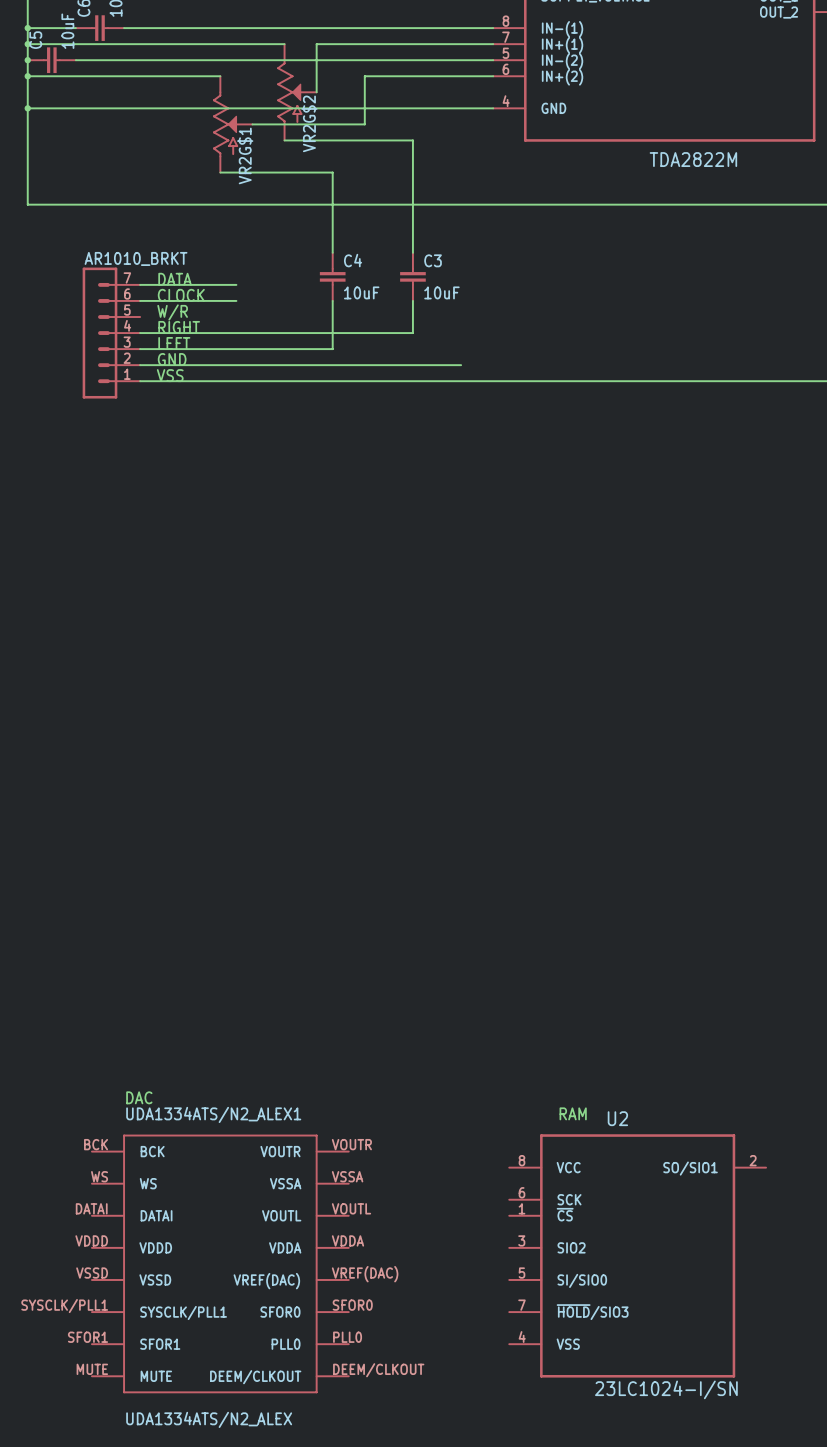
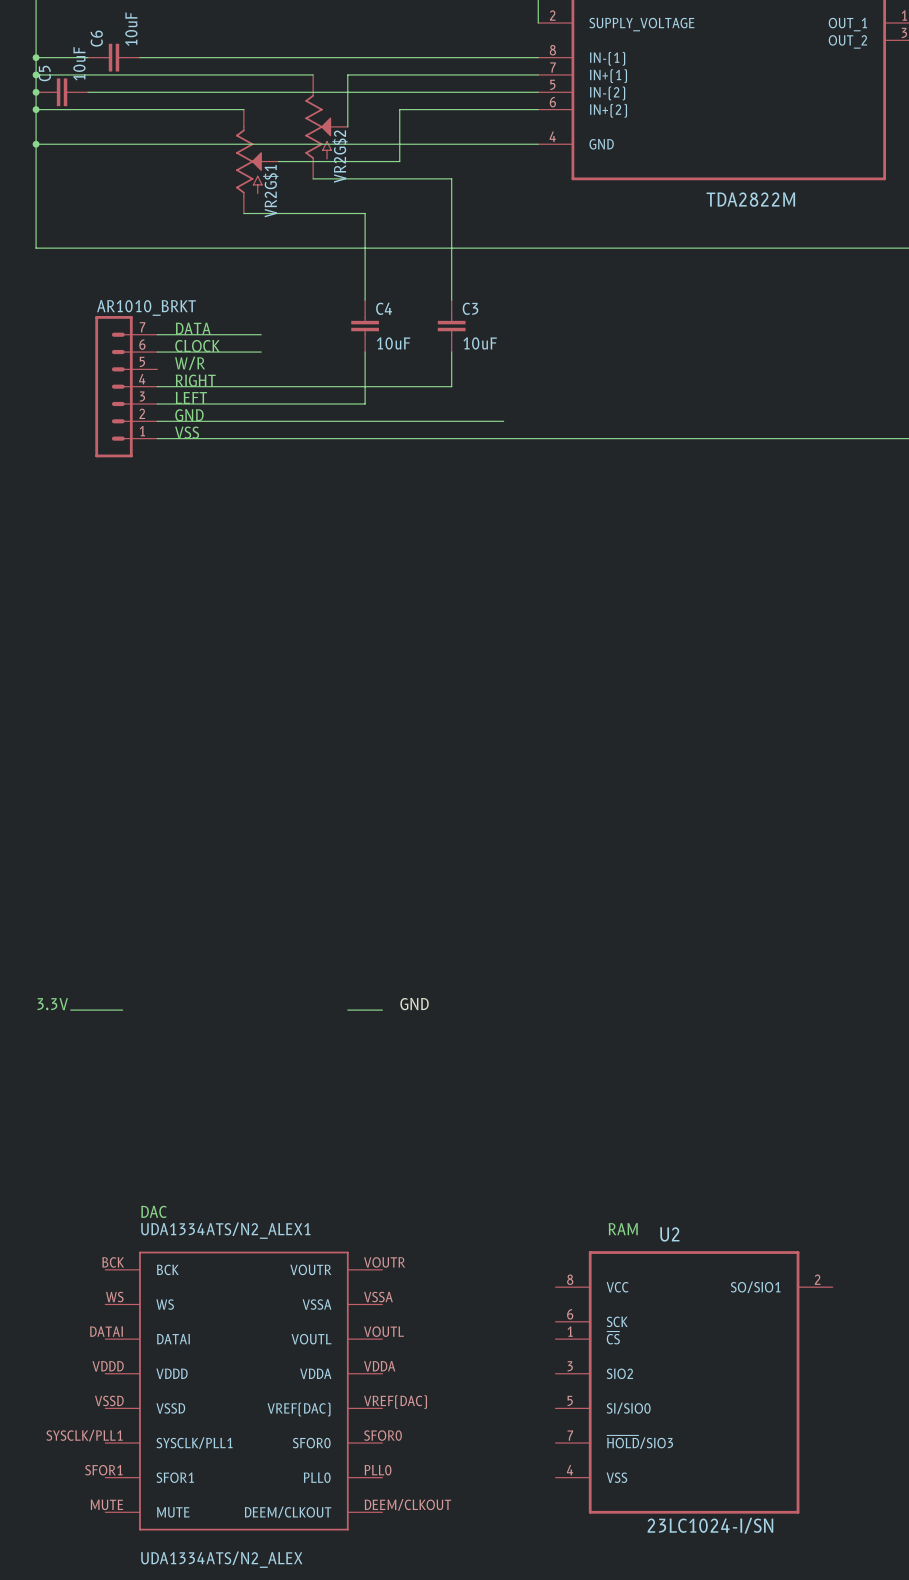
text: none -> 3.3V (52, 1004)
label: none -> GND (414, 1004)
wire: none -> (70, 1010) (122, 1010)
wire: none -> (347, 1010) (382, 1010)

